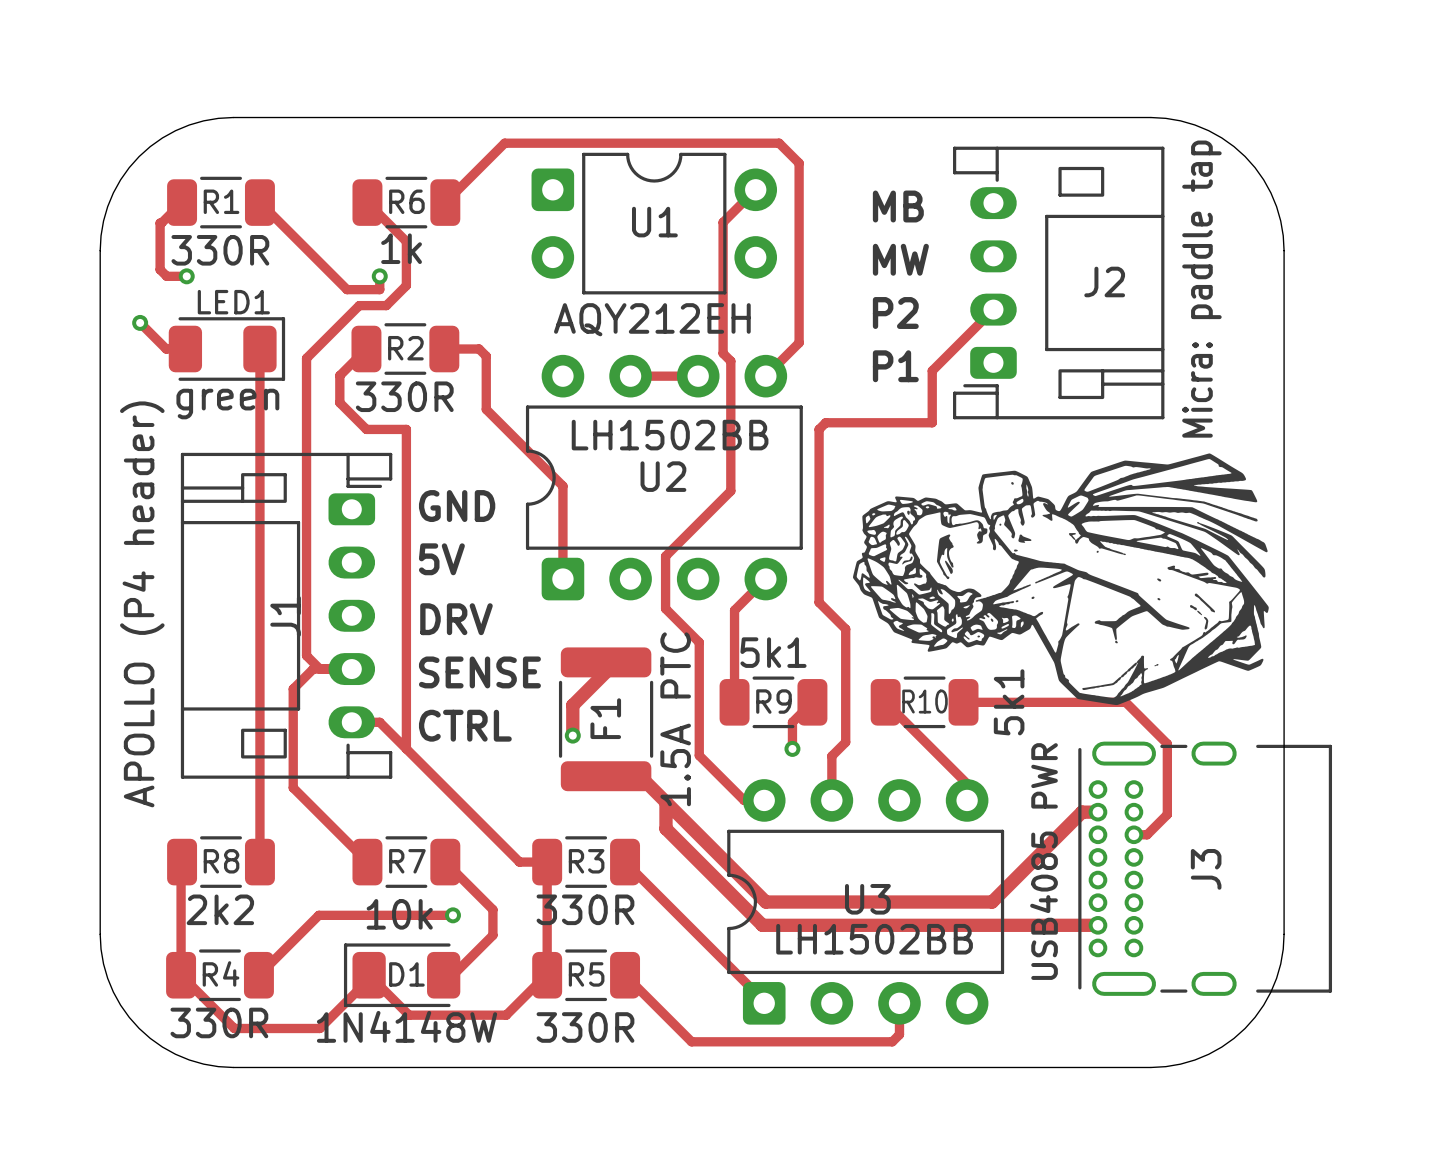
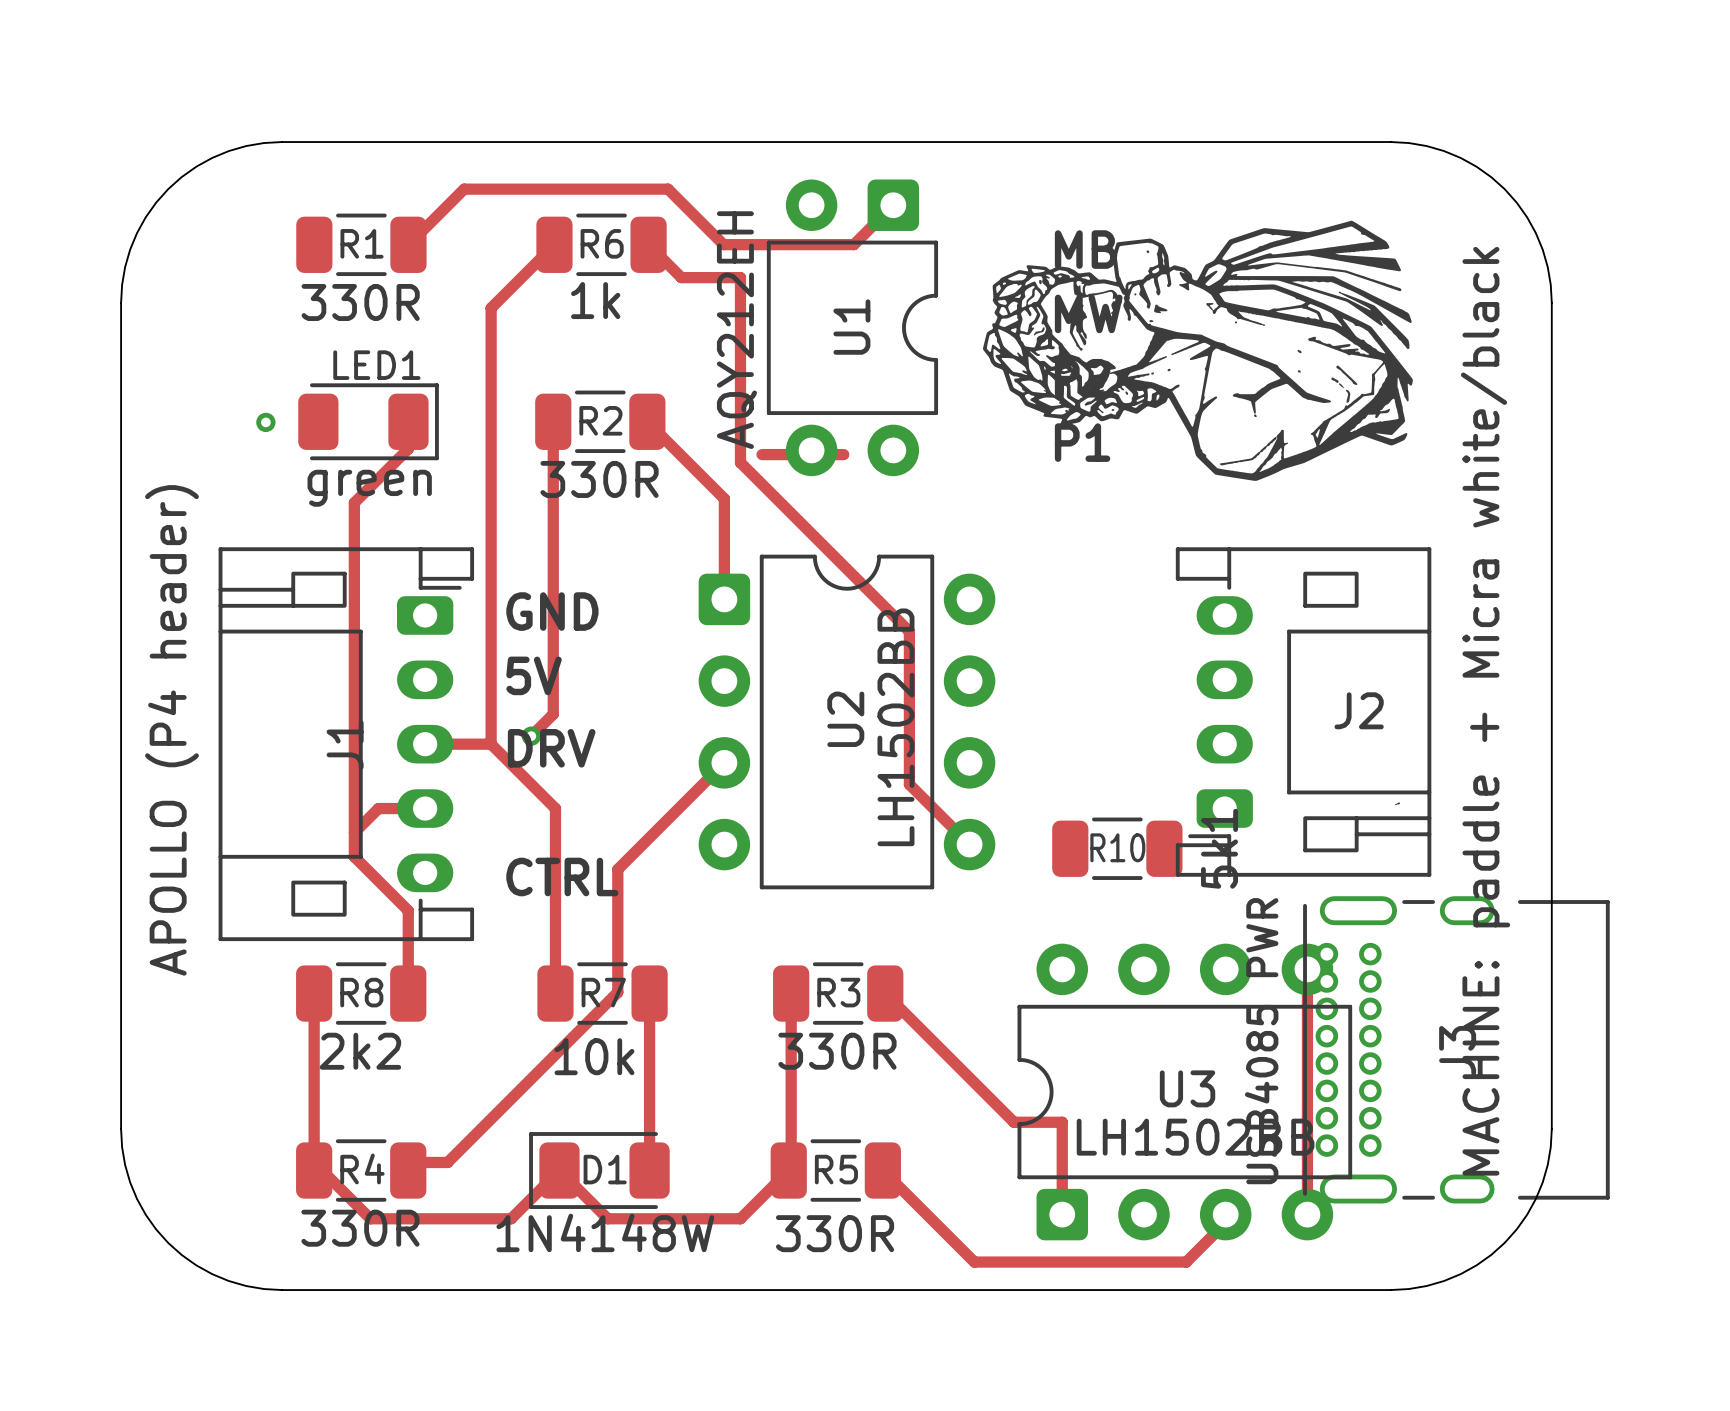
track: none -> (893, 205) (853, 244) (723, 244) (668, 189) (464, 189) (408, 244)
drawing: none -> [983, 220, 1413, 481]
track: (755, 189) (723, 222) (723, 353) (730, 361) (730, 491) (665, 556) (665, 608) (699, 642) (699, 755) (744, 800) (764, 800) -> none
track: (182, 202) (160, 223) (160, 269) (166, 276) (186, 276) -> none
R1 position: (221, 202) -> (361, 244)
track: (259, 202) (347, 289) (379, 289) (379, 276) -> none
track: (367, 202) (406, 241) (406, 254) -> (554, 244) (491, 308)
R6 position: (406, 202) -> (601, 244)
track: (445, 202) (504, 143) (779, 143) (799, 163) (799, 342) (765, 376) -> none
track: none -> (648, 244) (681, 277) (740, 277) (740, 462) (909, 631) (909, 784) (969, 844)
U1 rotation: 0° (654, 223) -> 90° clockwise (852, 327)
via: (186, 276) -> none
via: (379, 276) -> none
J2 position: (1058, 282) -> (1303, 712)
track: (406, 285) (386, 305) (359, 305) (306, 358) (306, 655) (319, 669) -> none
J2 value: Micra: paddle tap (1201, 289) -> MACHINE: paddle + Micra white/black (1485, 711)
track: (993, 309) (932, 370) (932, 422) (825, 422) (819, 429) (819, 602) (845, 629) (845, 742) (831, 756) (831, 800) -> none
track: (140, 322) (166, 349) (185, 349) -> none
via: (140, 322) -> none
via: none -> (265, 422)
LED1 position: (226, 349) -> (368, 421)
track: (259, 349) (259, 822) -> none
track: none -> (408, 421) (408, 448) (354, 502) (354, 832)
track: (366, 349) (339, 375) (339, 402) (366, 429) (406, 429) -> (491, 345) (491, 518)
R2 position: (405, 349) -> (600, 421)
track: (444, 349) (479, 349) (486, 356) (486, 409) (562, 486) (562, 579) -> none
track: none -> (553, 421) (553, 714) (531, 736)
track: none -> (647, 421) (724, 498) (724, 599)
drawing: [853, 453, 1269, 706] -> none
U2 rotation: 0° (664, 477) -> 90° clockwise (846, 721)
drawing position: (908, 512) -> (1040, 282)
track: (765, 579) (734, 610) (734, 702) -> none
via: none -> (531, 736)
drawing position: (1199, 612) -> (1341, 385)
track: none -> (425, 744) (491, 744) (555, 808) (555, 993)
track: (406, 615) (406, 748) -> none
track: none -> (724, 762) (617, 869) (617, 992) (447, 1162) (408, 1162)
text: SENSE (479, 672) -> none
track: (606, 672) (572, 705) (572, 735) -> none
R9: 5k1 (773, 702) -> none
track: (812, 702) (792, 722) (792, 748) -> none
track: (885, 702) (967, 783) (967, 800) -> none
track: (963, 702) (1125, 702) (1167, 743) (1167, 814) (1147, 834) (1133, 834) -> none
track: (293, 708) (293, 787) (367, 862) -> (354, 856) (408, 910) (408, 993)
F1: 1.5A PTC (606, 719) -> none
track: (351, 722) (379, 722) (519, 862) (547, 862) (547, 975) (506, 1015) (409, 1015) (369, 975) (369, 979) (319, 1028) (234, 1028) (181, 975) (182, 862) -> none
via: (572, 735) -> none
via: (792, 748) -> none
track: (606, 776) (640, 776) (765, 902) (992, 902) (1082, 812) (1097, 812) -> none
track: (665, 802) (665, 828) (762, 925) (1097, 925) -> none
track: none -> (1307, 977) (1307, 1222)
track: none -> (649, 993) (649, 1170)
track: none -> (791, 993) (791, 1168) (740, 1218) (607, 1218) (559, 1170) (511, 1218) (370, 1218) (314, 1162) (314, 1041)
track: none -> (885, 993) (1013, 1122) (1062, 1122) (1062, 1222)
R8 position: (221, 862) -> (361, 993)
R7 position: (406, 862) -> (602, 993)
track: (445, 862) (492, 909) (492, 935) (452, 975) (443, 975) -> none
R3 position: (586, 862) -> (838, 993)
track: (625, 862) (764, 1003) -> none
U3 position: (865, 901) -> (1184, 1092)
track: (452, 915) (318, 915) (258, 975) -> none
via: (452, 915) -> none
track: none -> (882, 1170) (974, 1262) (1186, 1262) (1225, 1222)
R4 position: (220, 975) -> (361, 1170)
D1 position: (402, 975) -> (599, 1170)
R5 position: (586, 975) -> (835, 1170)
track: (625, 975) (691, 1041) (892, 1041) (899, 1034) (899, 1003) -> none

